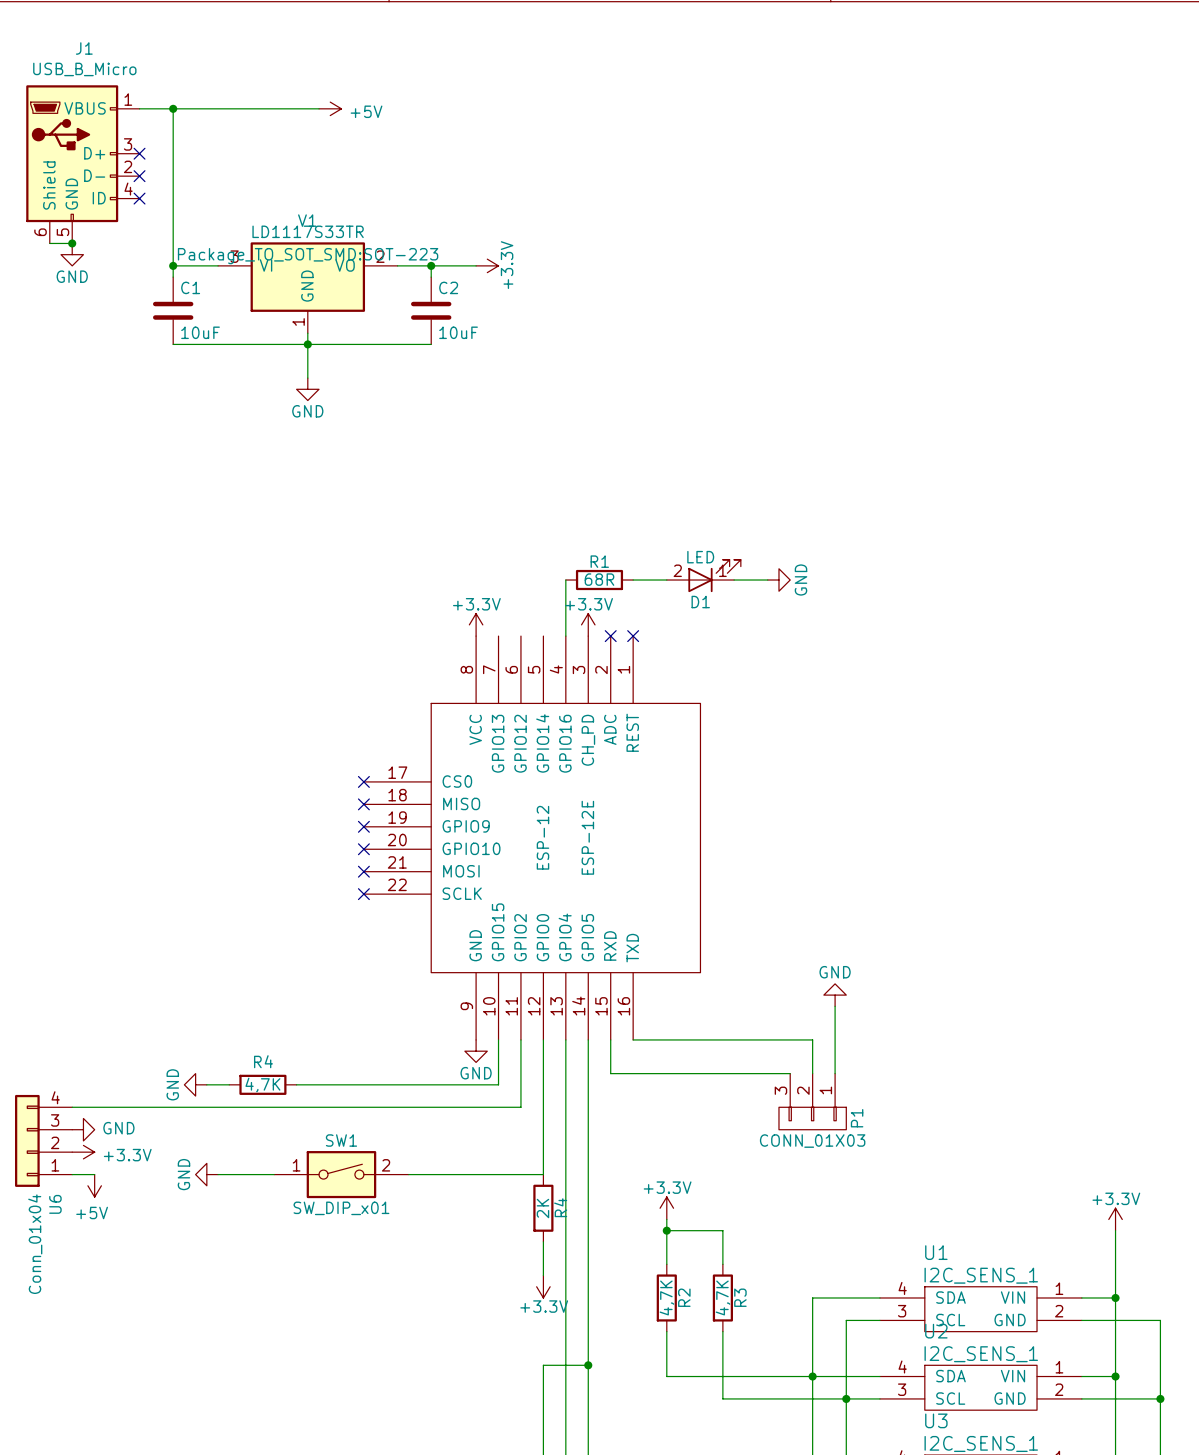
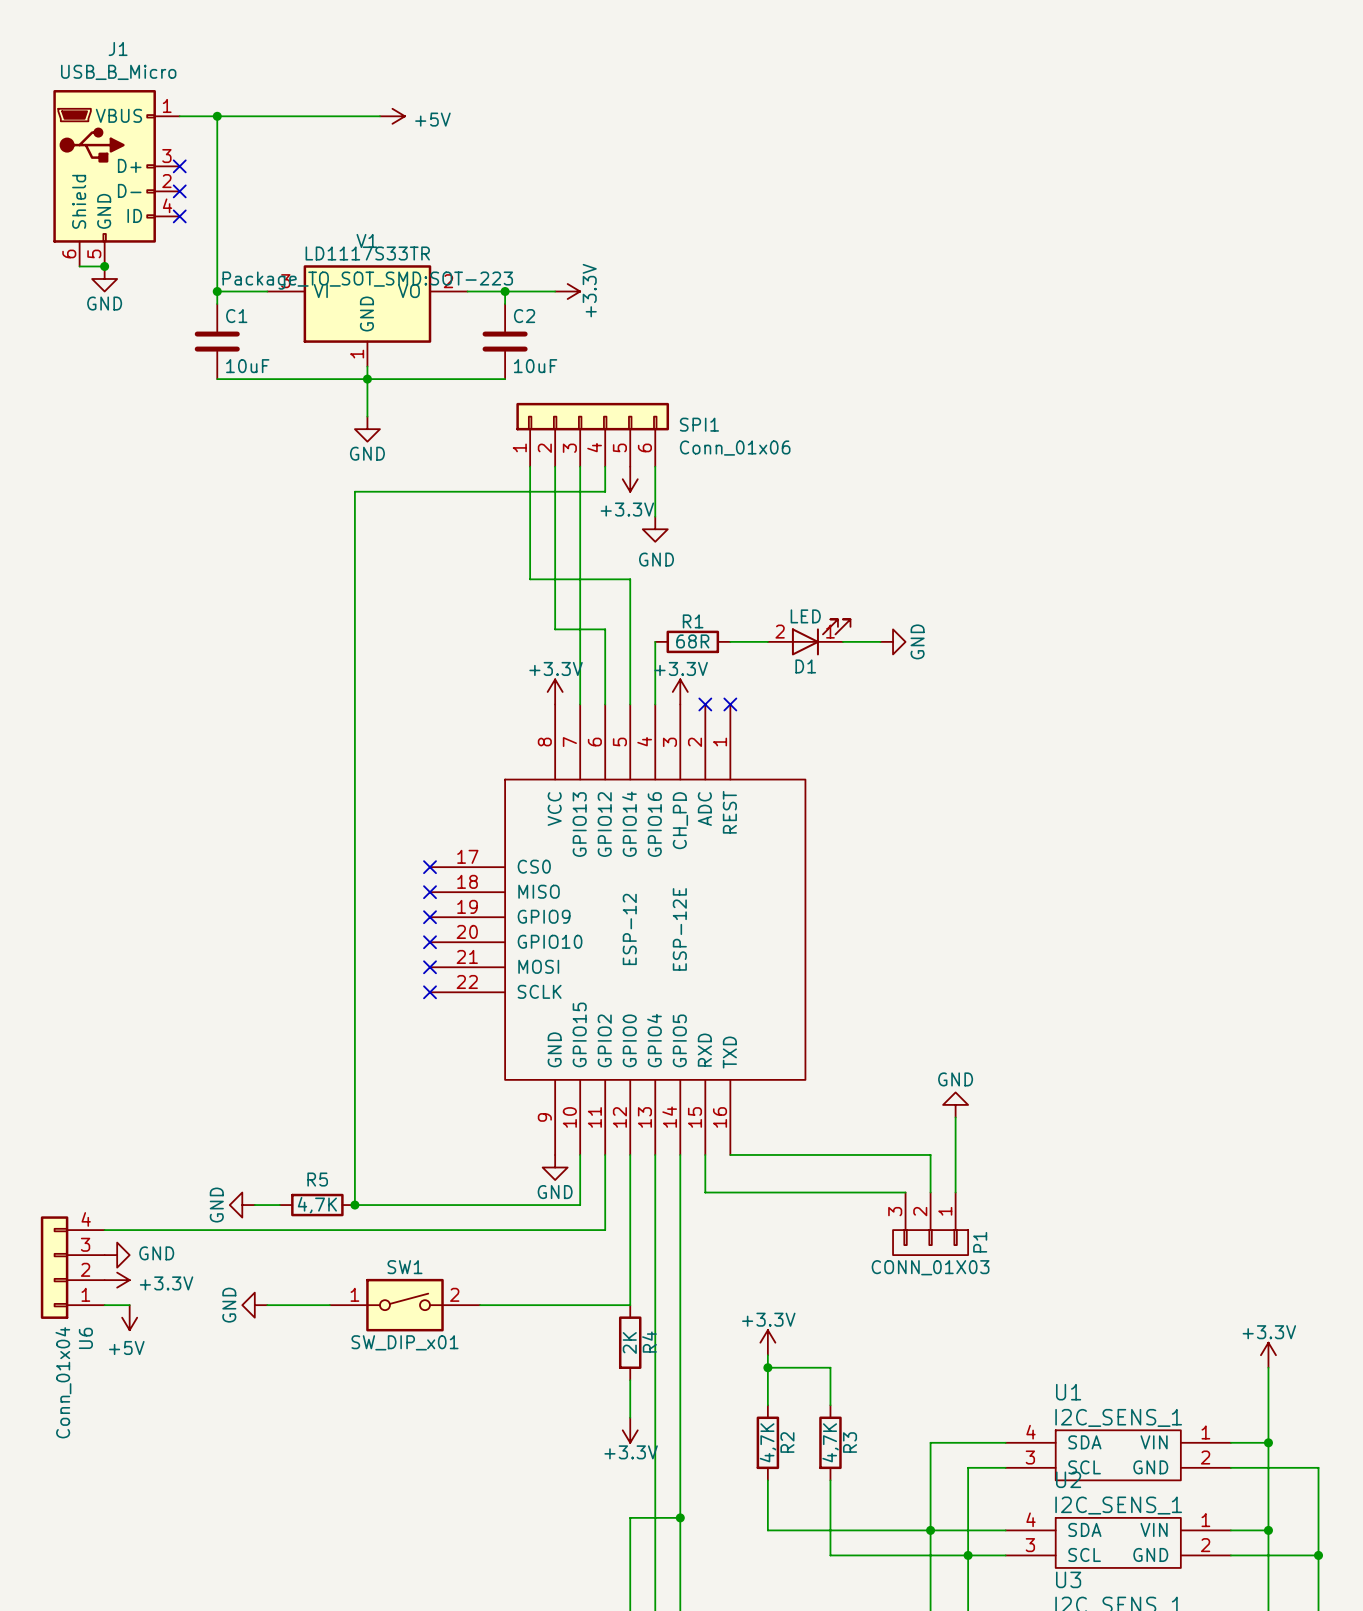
SPI1: none -> Conn_01x06 (592, 434)
wire: none -> (530, 466) (530, 579) (630, 579) (630, 704)
wire: none -> (555, 466) (555, 629) (605, 629) (605, 704)
wire: none -> (580, 466) (580, 704)
wire: none -> (605, 466) (605, 491) (354, 491) (354, 1205)
wire: none -> (655, 466) (655, 516)
power symbol: none -> +3.3V (630, 479)
power symbol: none -> GND (655, 529)
R4 name: R4 (263, 1061) -> R5 (317, 1179)
junction: none -> (354, 1205)

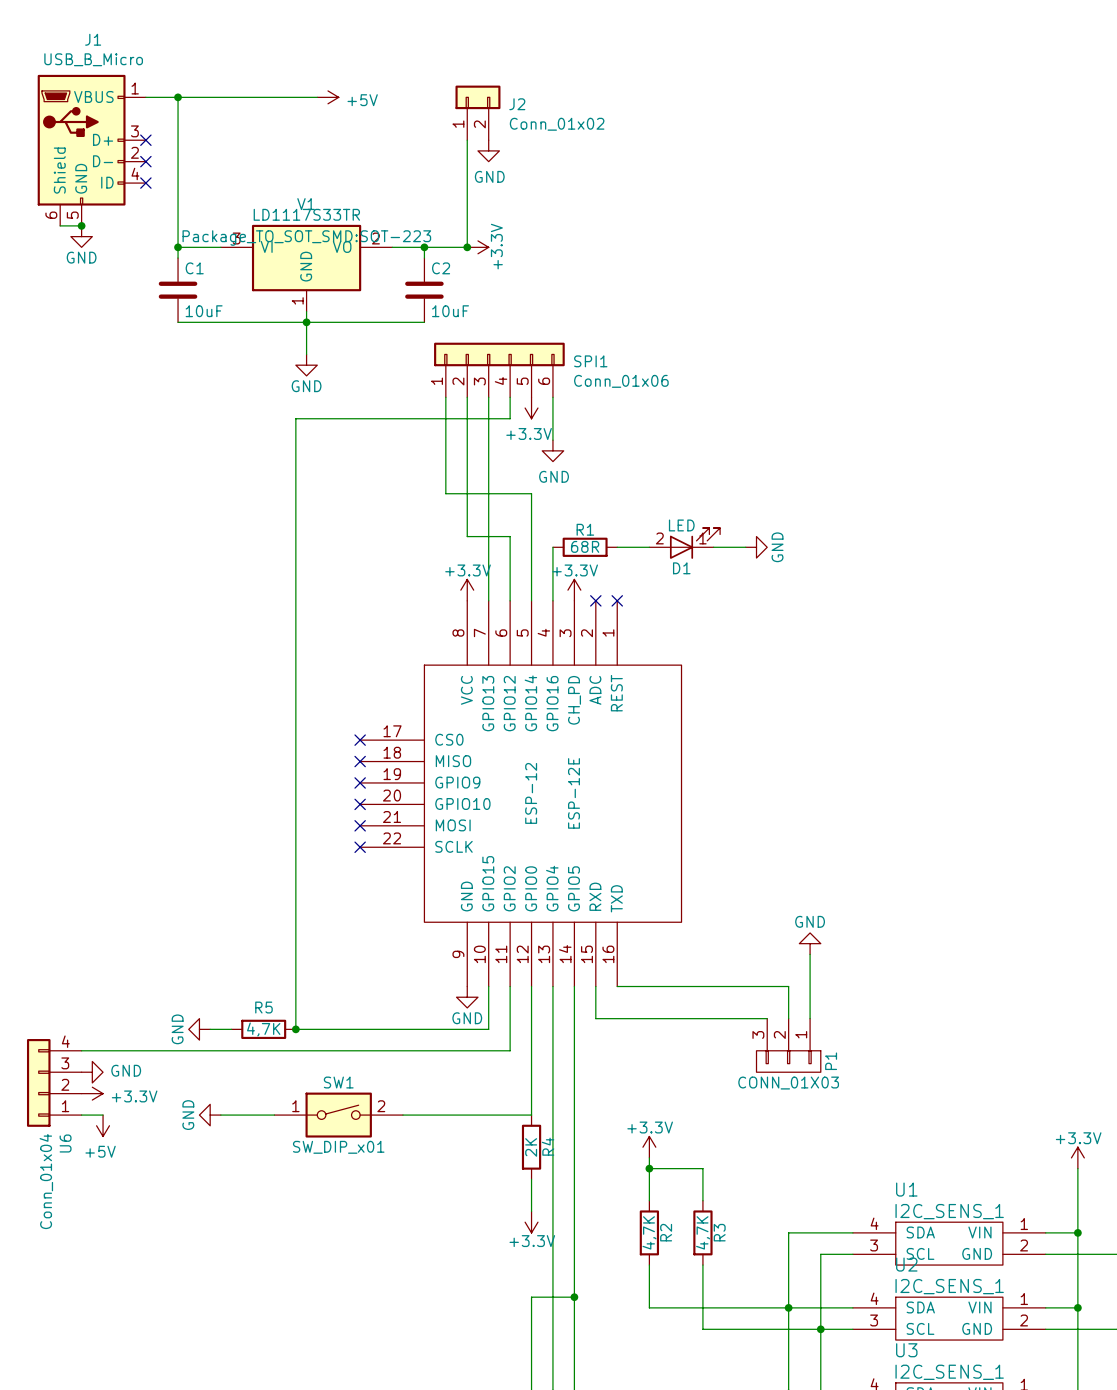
J2: none -> Conn_01x02 (477, 112)
wire: none -> (467, 140) (467, 247)
power symbol: none -> GND (488, 150)
junction: none -> (467, 247)

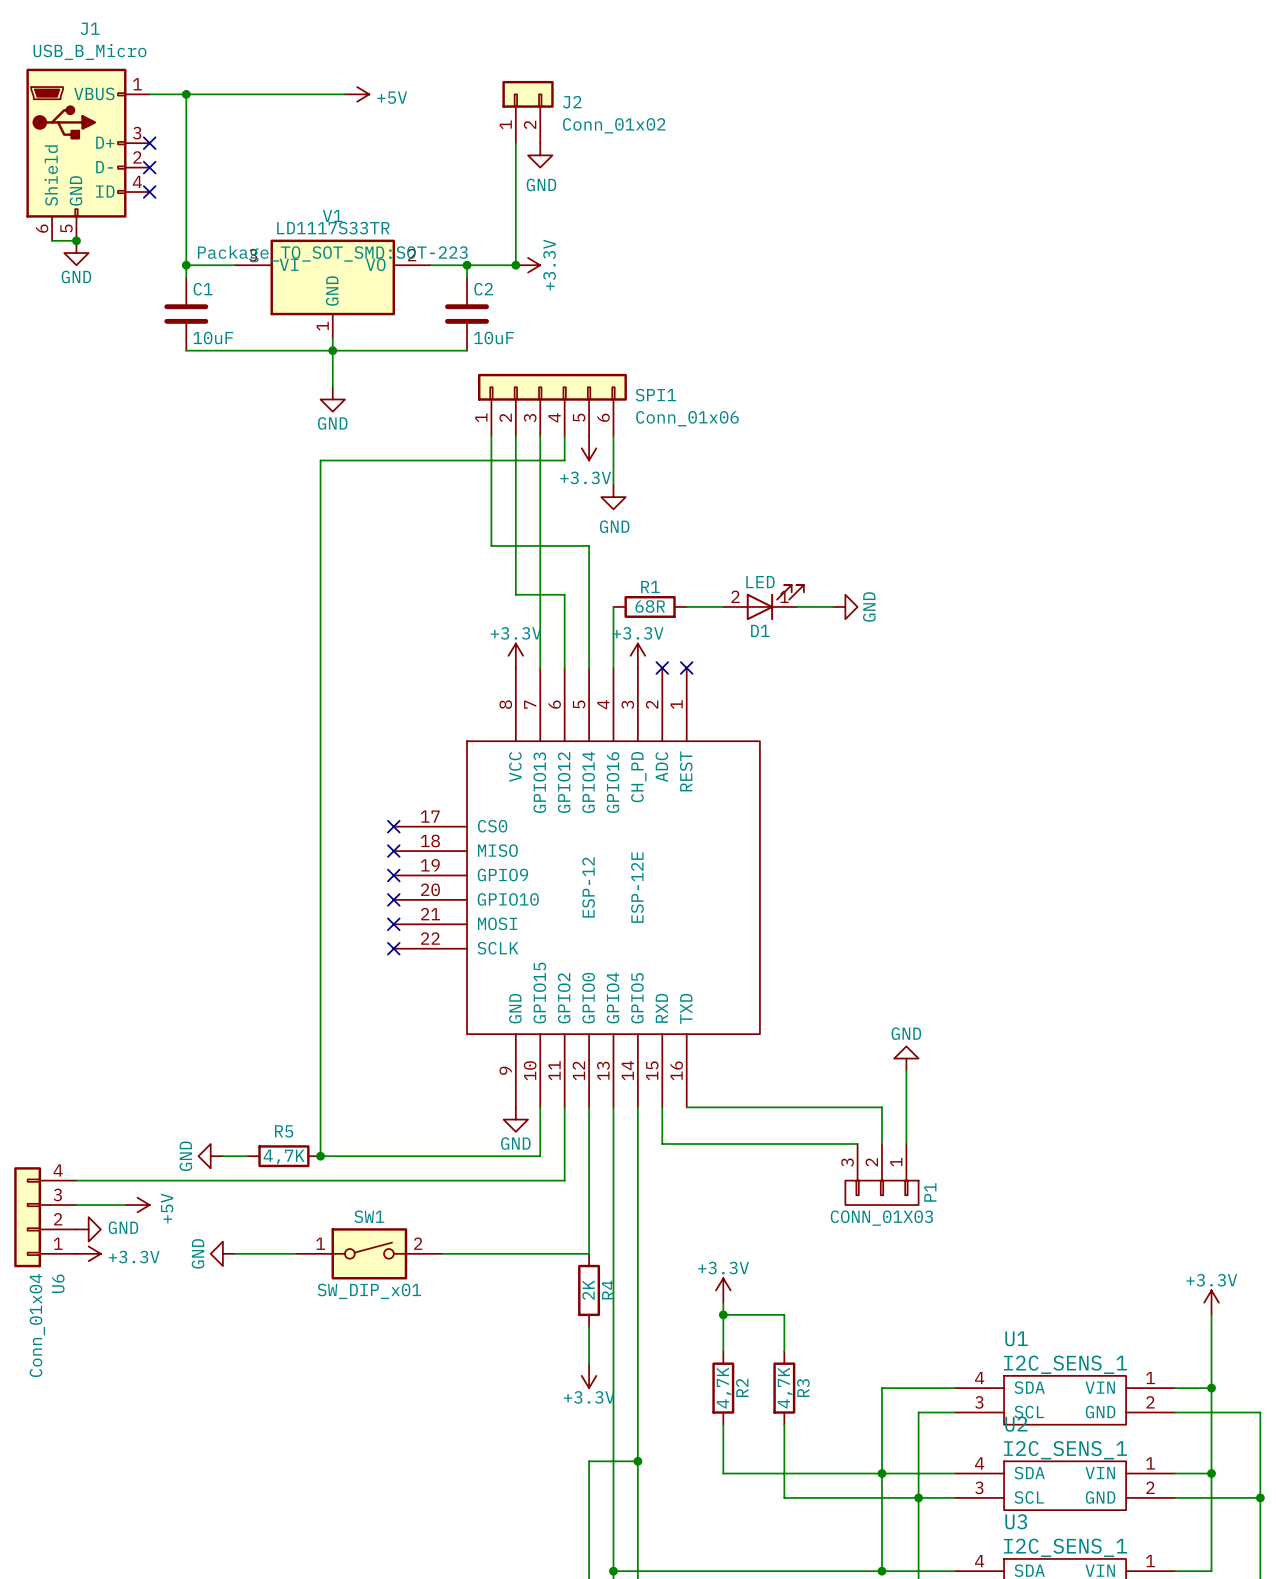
wire: none -> (76, 1205) (125, 1205)
power symbol: GND (92, 1072) -> none
power symbol: +3.3V (92, 1093) -> GND (88, 1229)
power symbol: none -> +3.3V (88, 1253)
power symbol rotation: 0° (103, 1125) -> 90° counterclockwise (137, 1205)
power symbol position: +5V (103, 1125) -> +5V (137, 1205)

